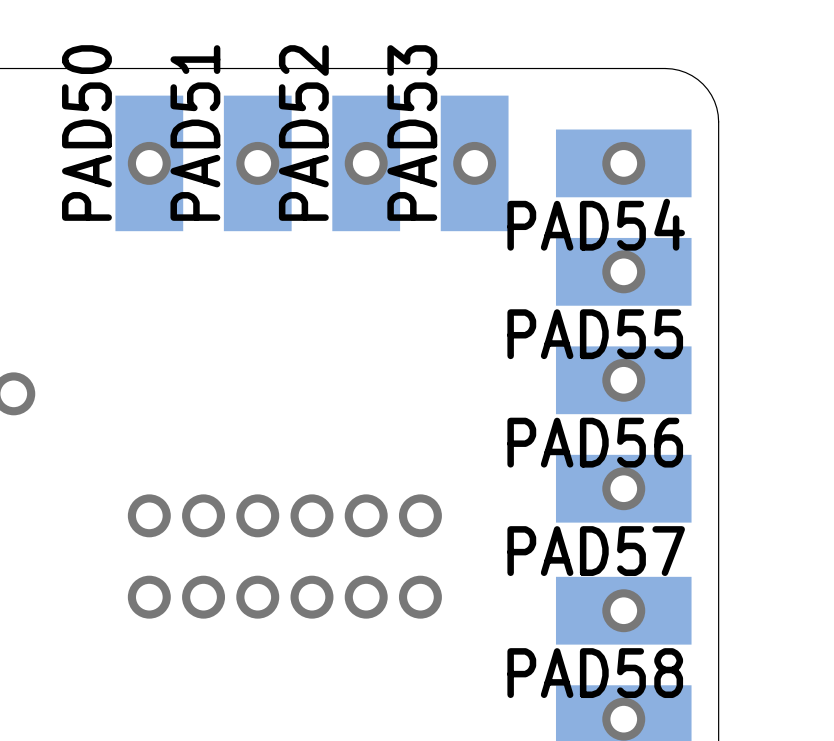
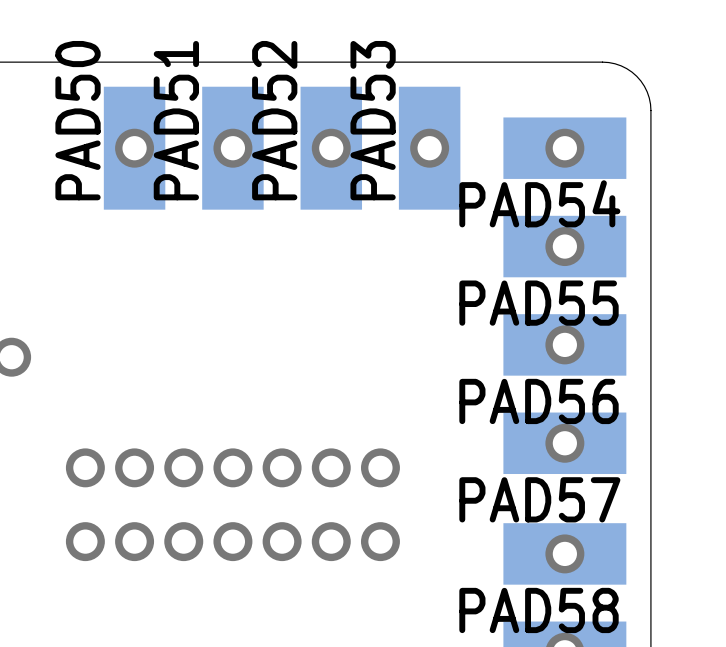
via: none -> (85, 467)
via: none -> (85, 541)

